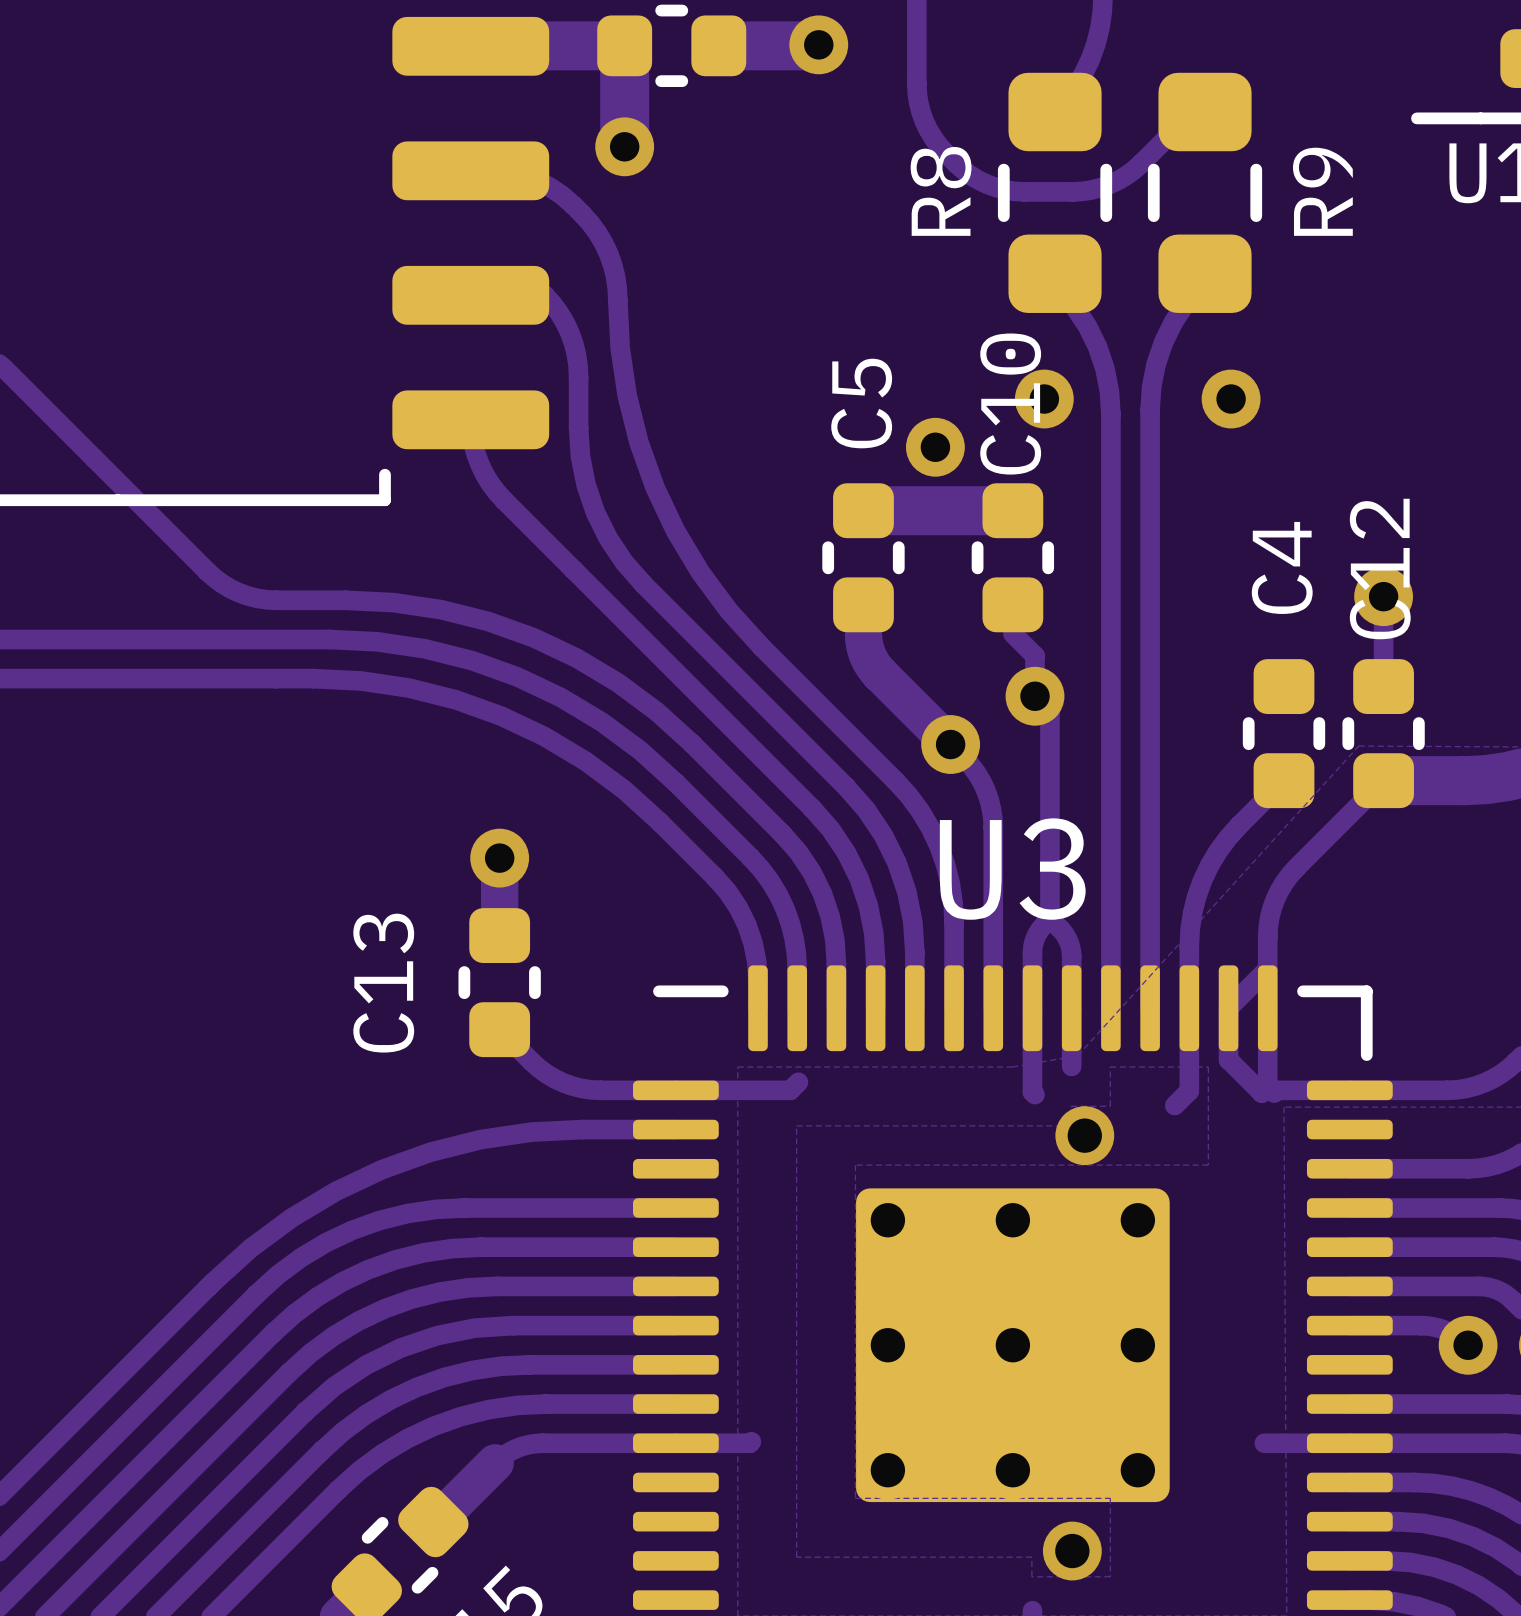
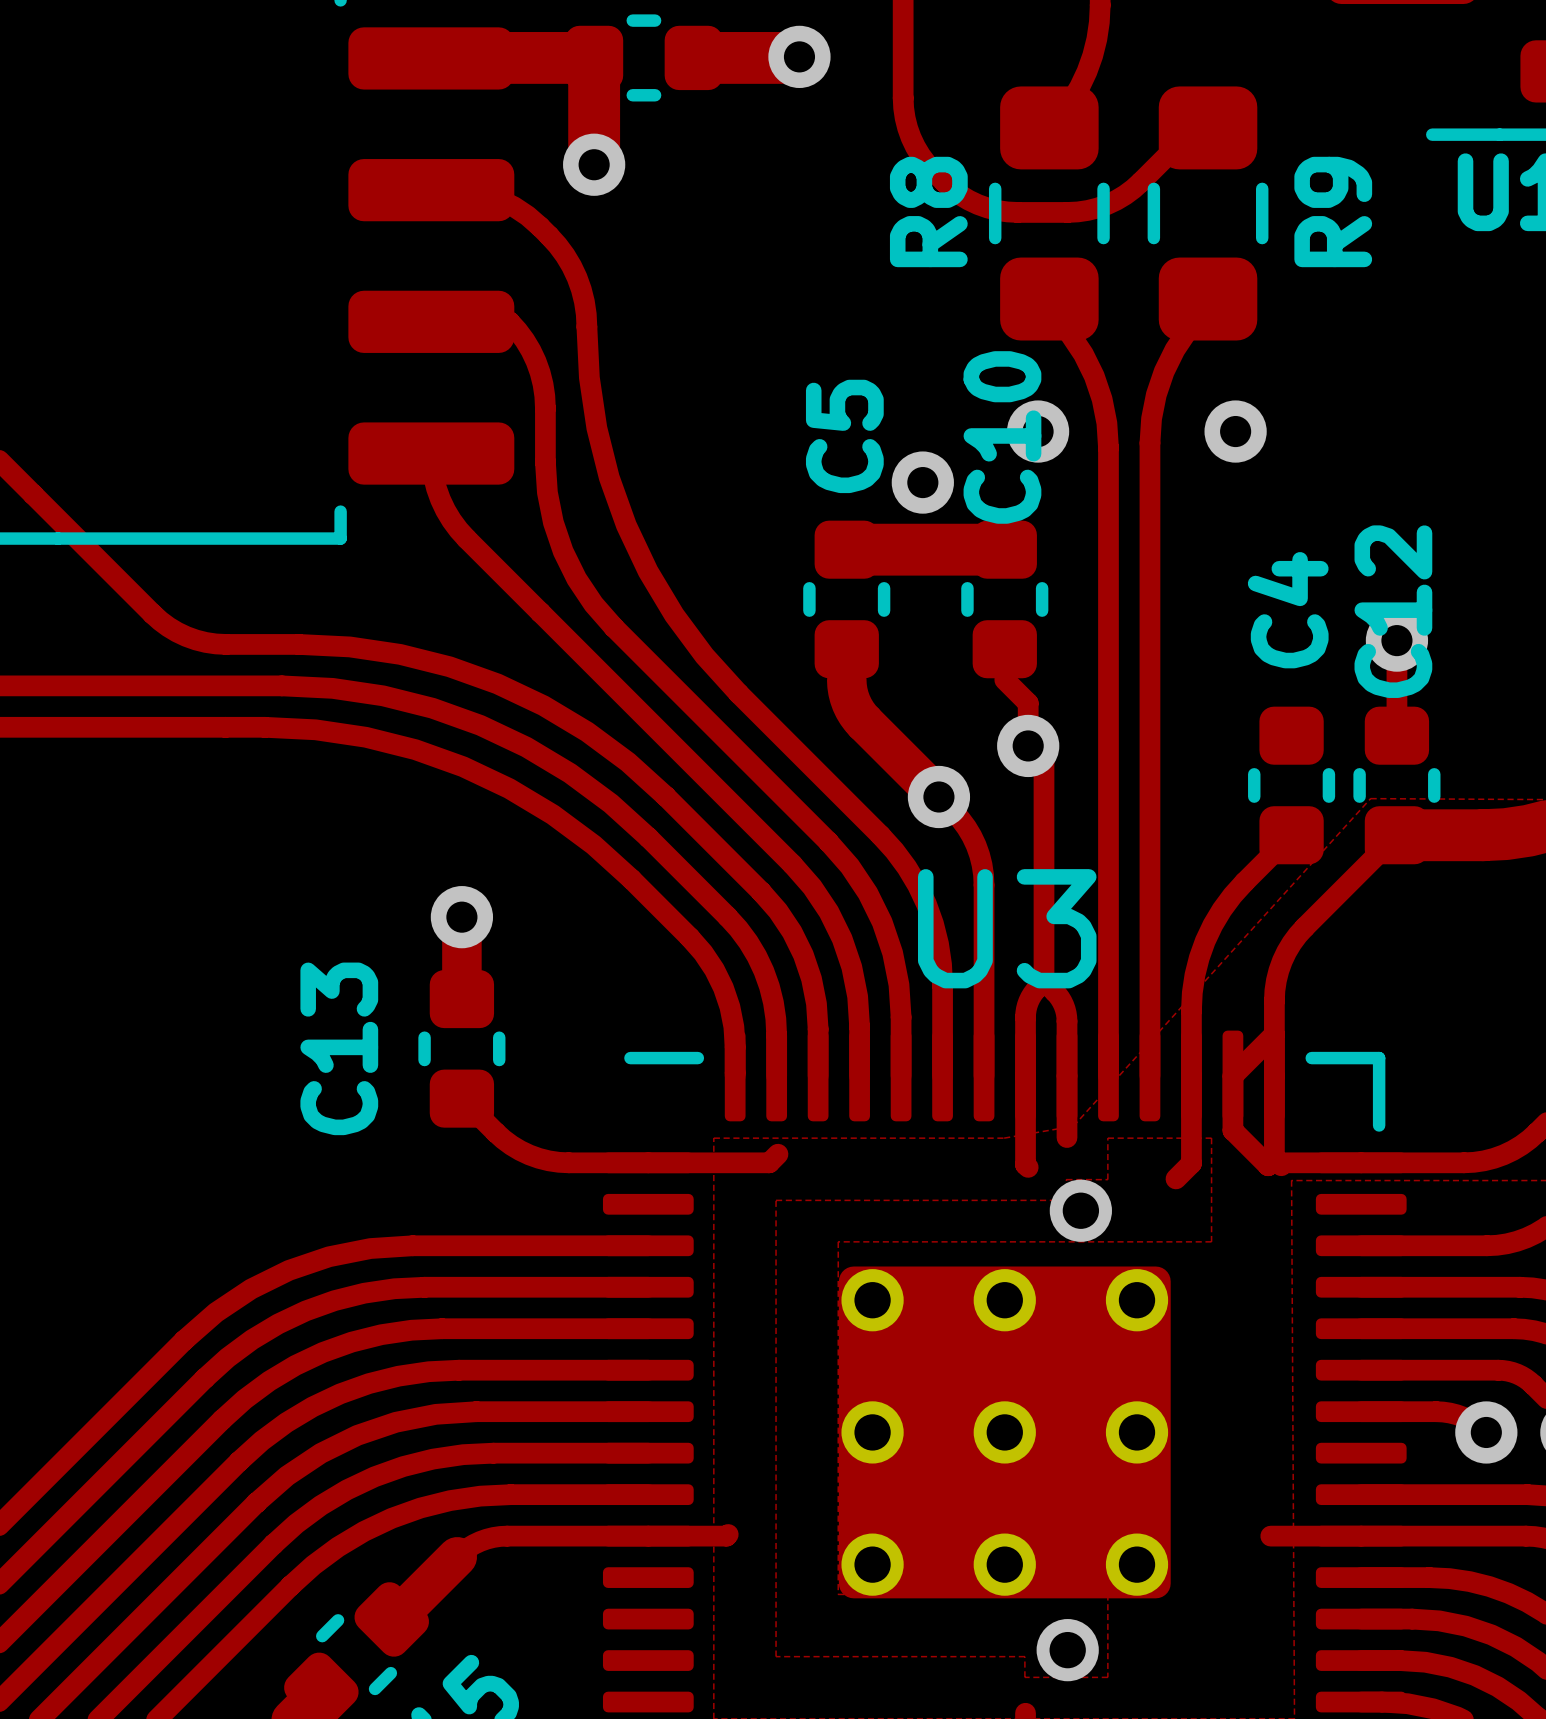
track: (675, 1129) (582, 1129) (531, 1132) (480, 1139) (430, 1152) (382, 1169) (335, 1191) (291, 1217) (250, 1248) (212, 1283) -> (648, 1245) (412, 1245) (370, 1248) (329, 1256) (289, 1270) (251, 1289) (215, 1312) (157, 1366)

